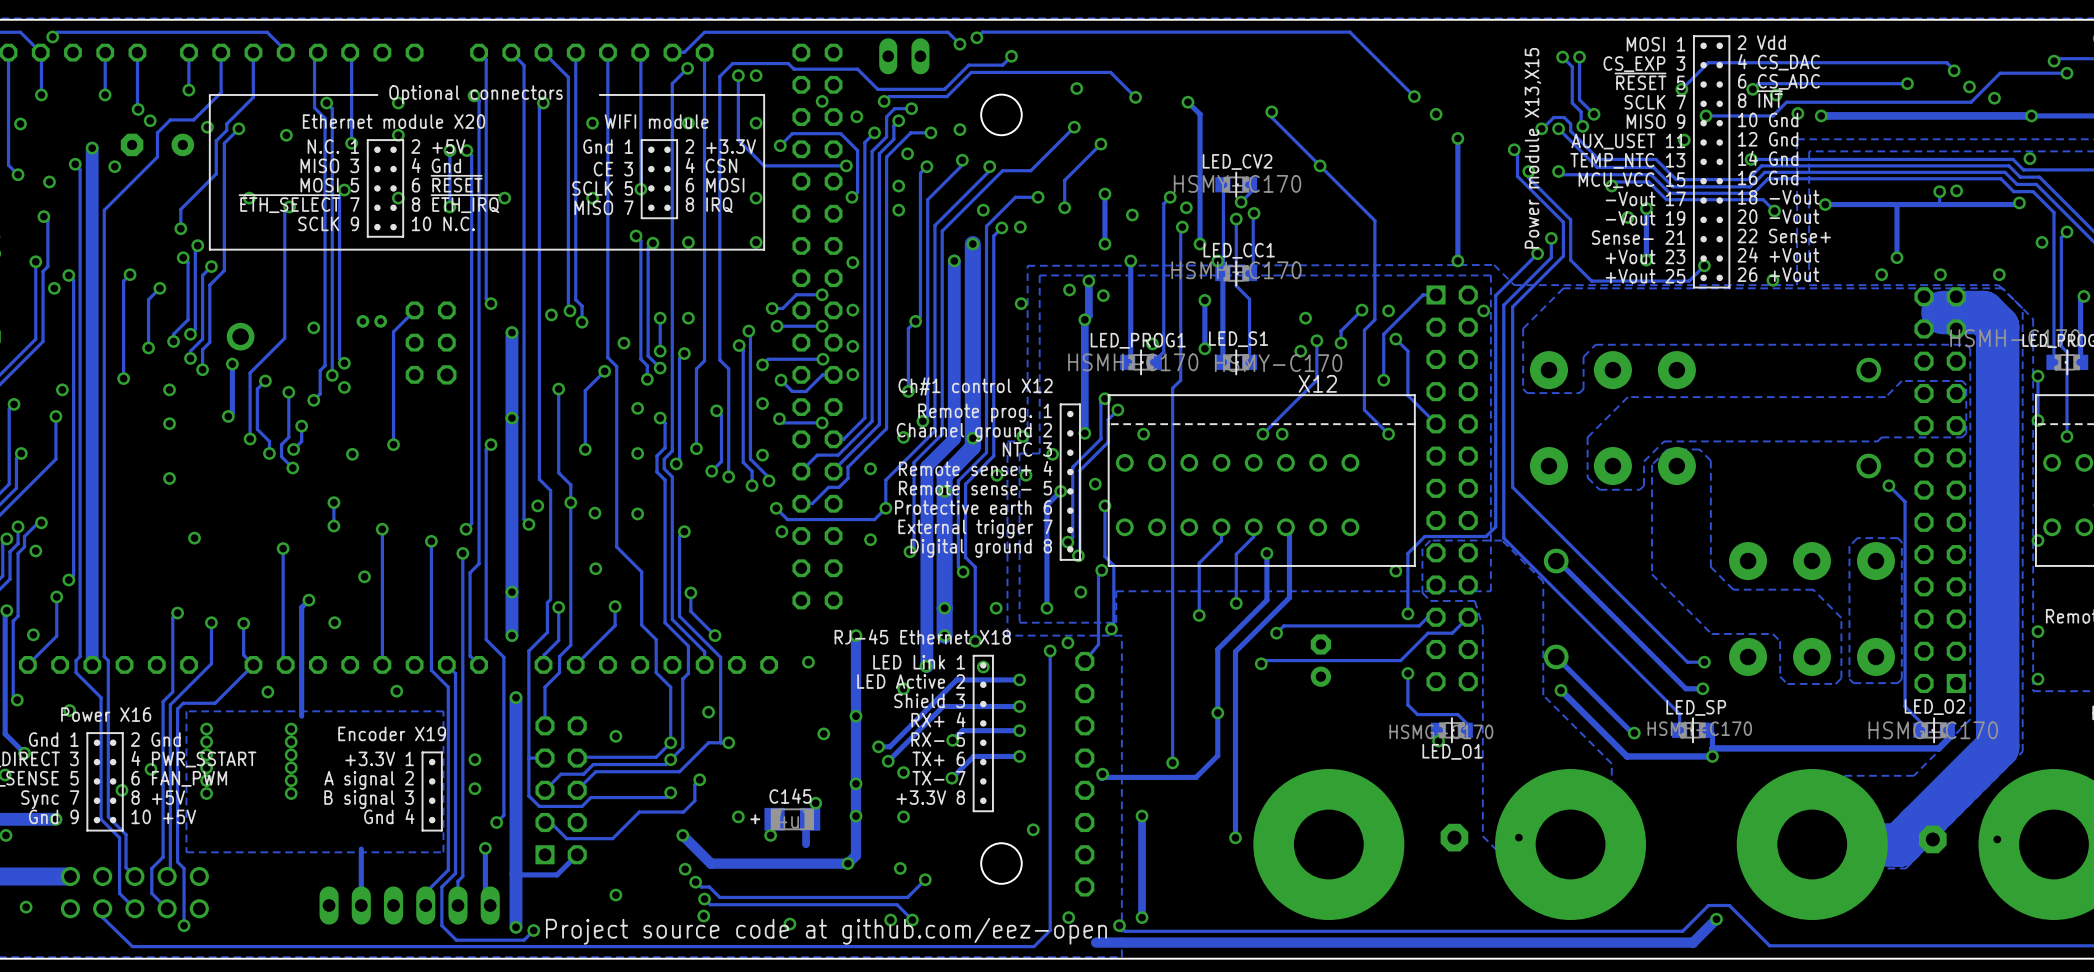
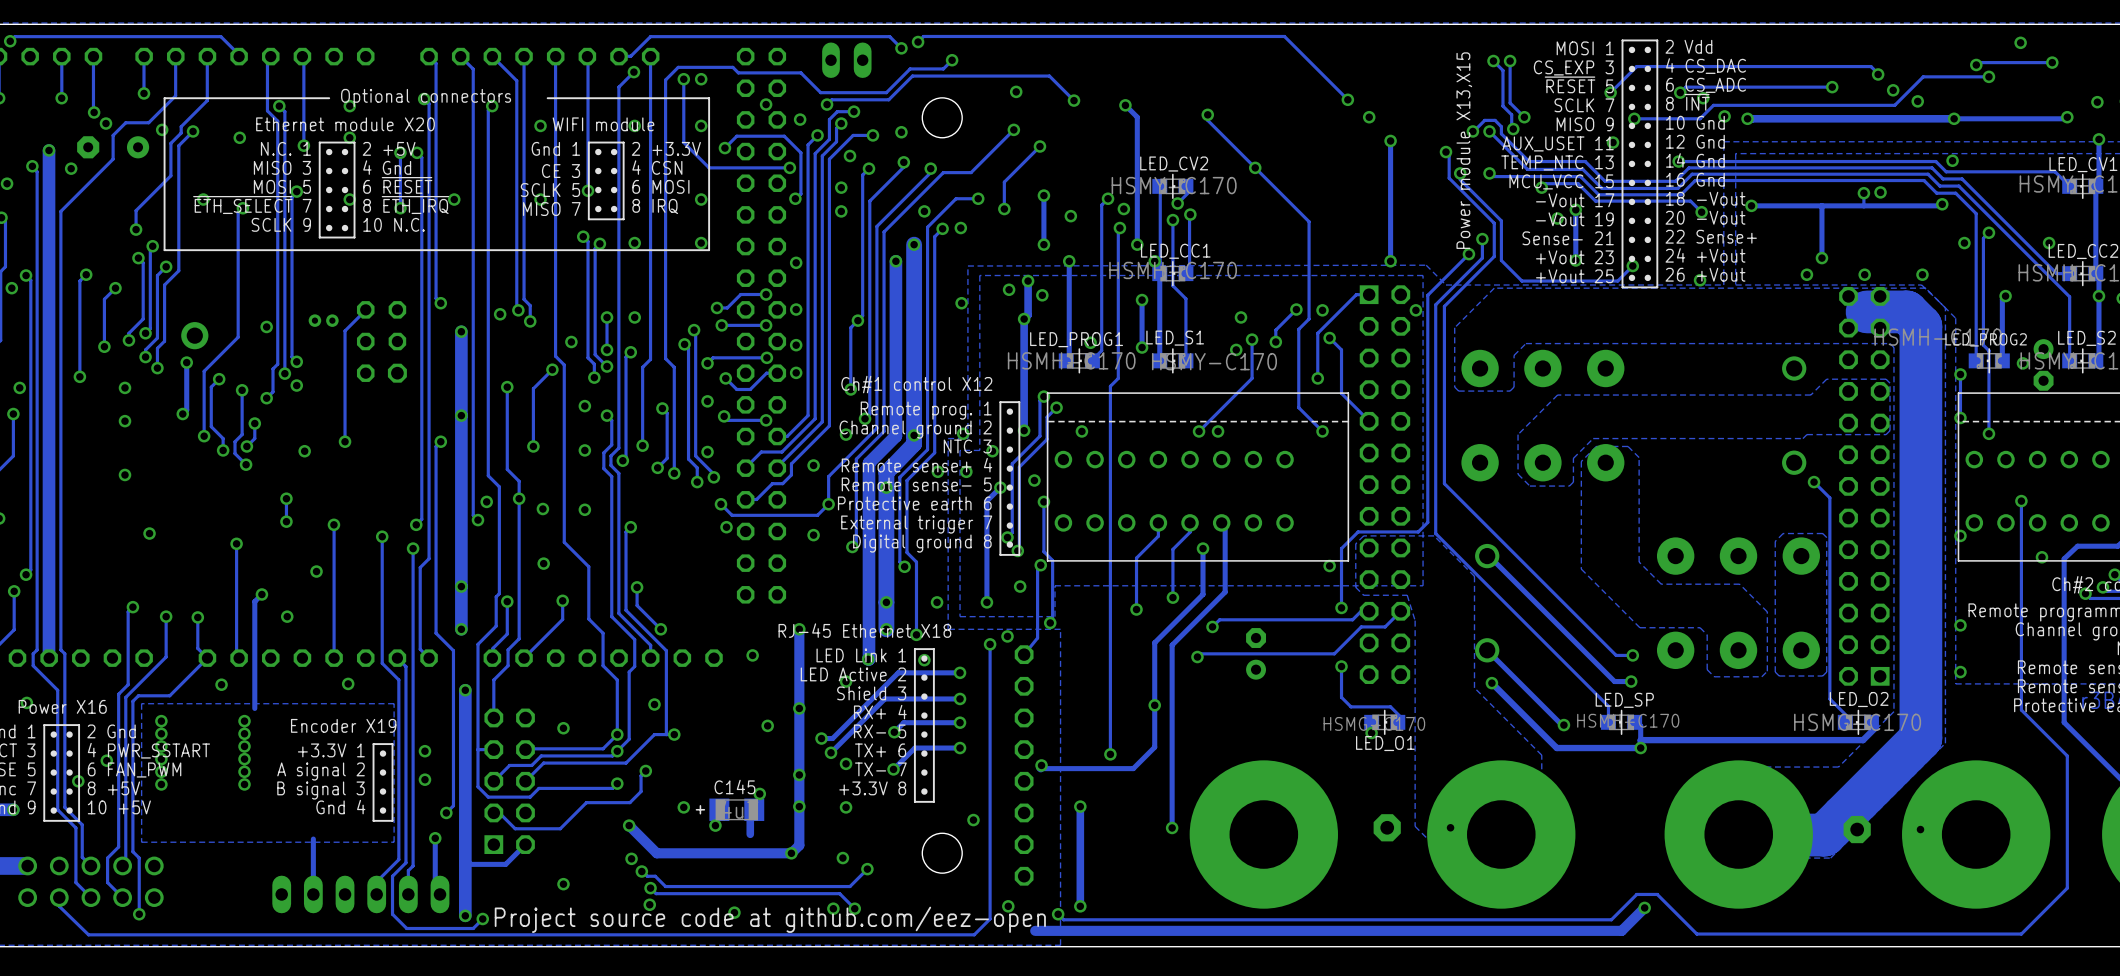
X12 name: X12 (1317, 383) -> none

